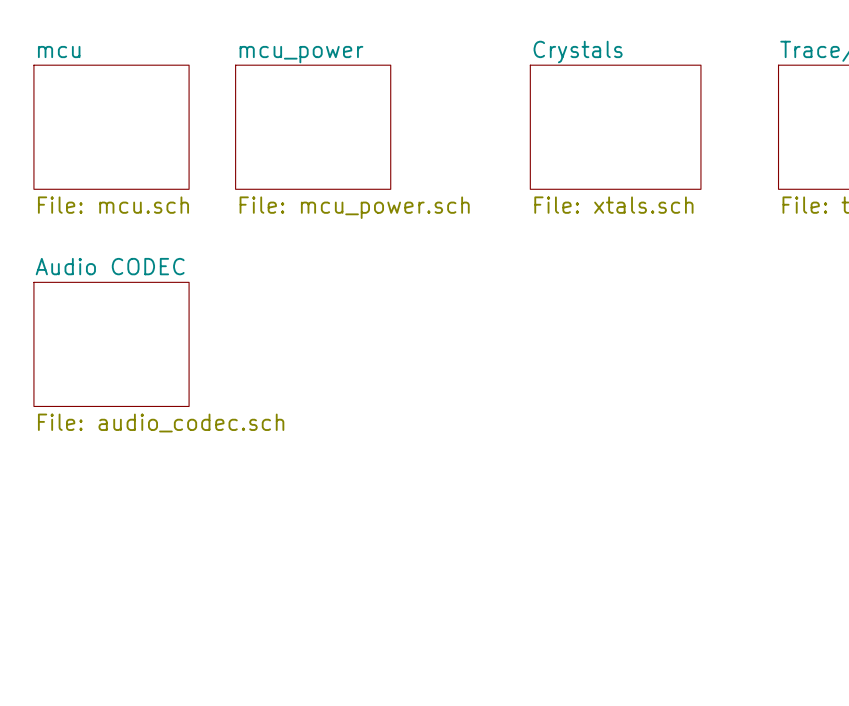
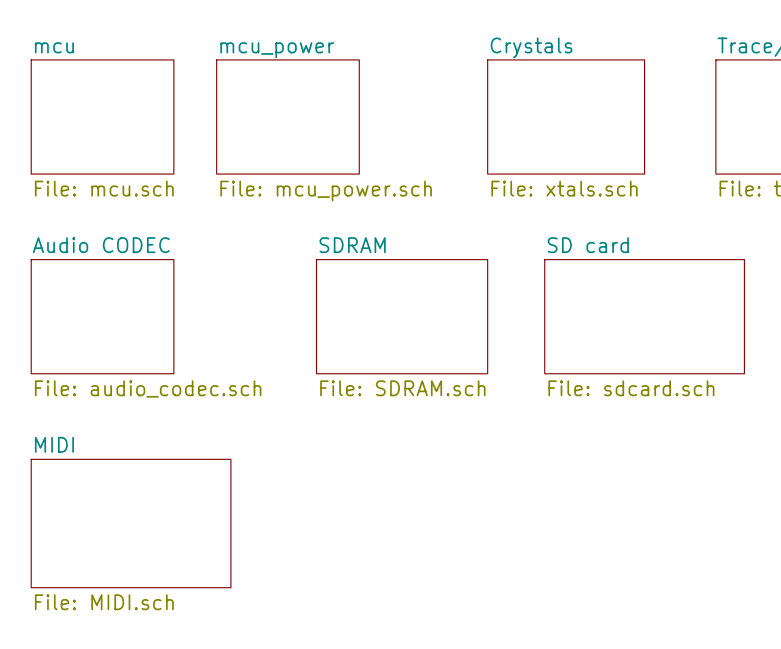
sheet SDRAM: none -> File: SDRAM.sch (402, 316)
sheet SD card: none -> File: sdcard.sch (644, 316)
sheet MIDI: none -> File: MIDI.sch (131, 523)

